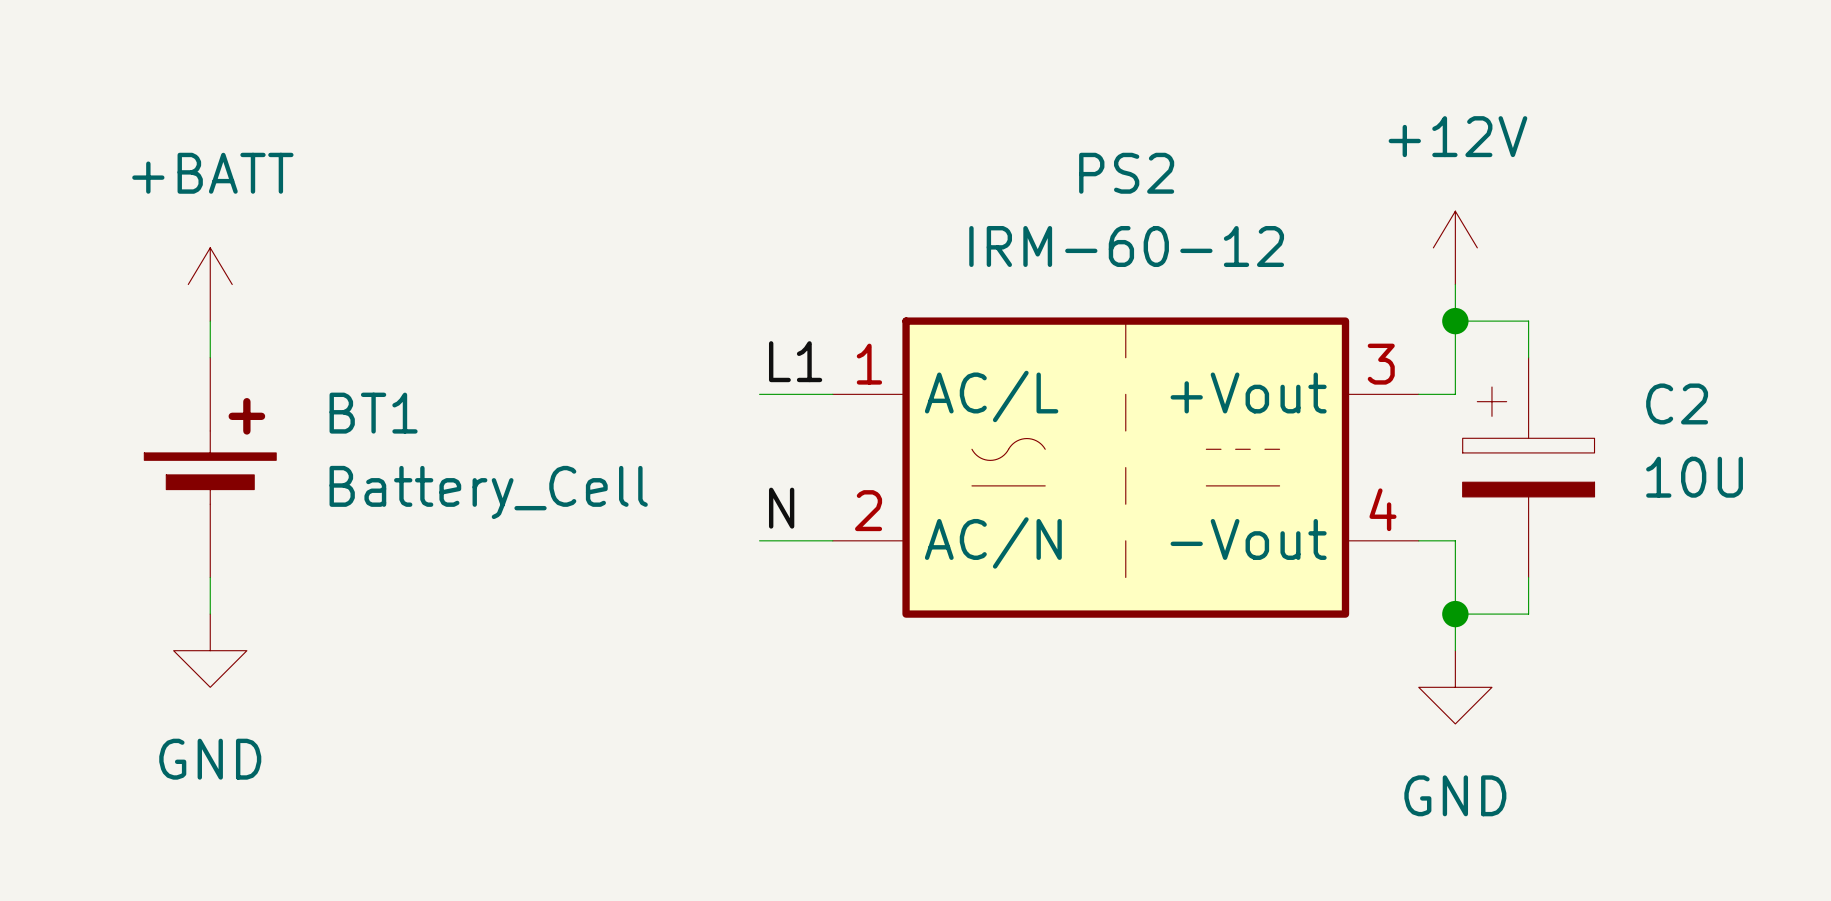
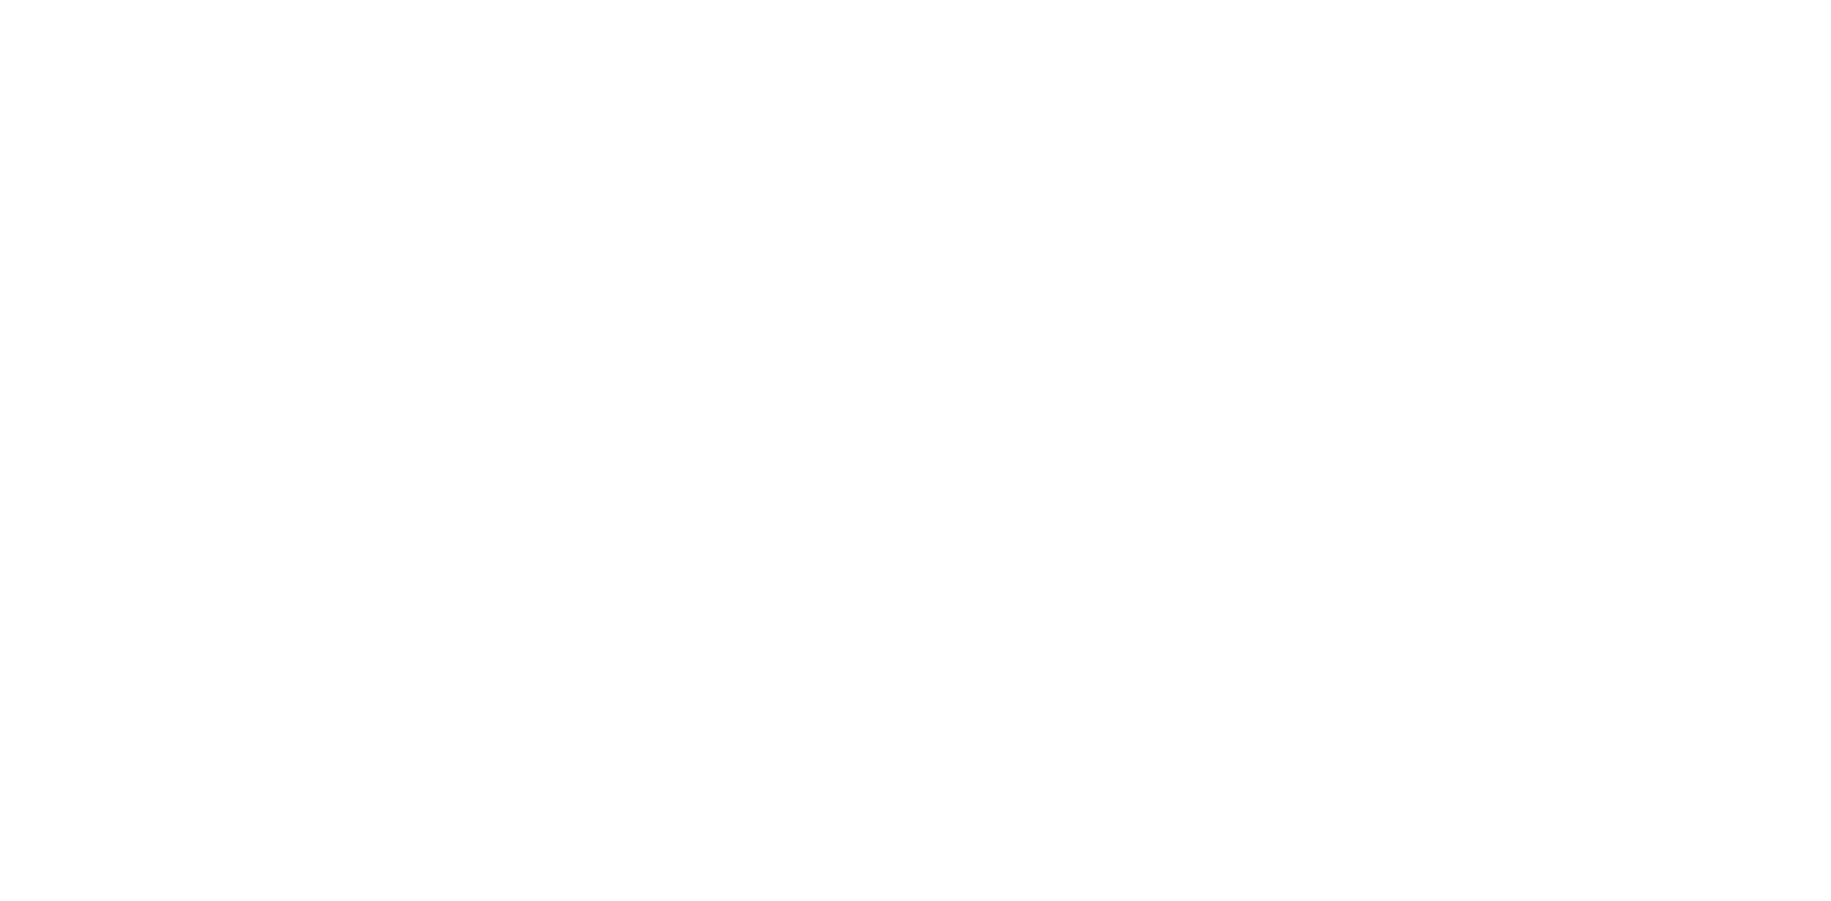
power symbol: +12V (1455, 247) -> none
power symbol: +BATT (210, 284) -> none
wire: (1455, 284) (1455, 394) (1418, 394) -> none
wire: (210, 321) (210, 357) -> none
wire: (1455, 321) (1528, 321) (1528, 357) -> none
junction: (1455, 321) -> none
label: L1 (795, 361) -> none
wire: (759, 394) (832, 394) -> none
BT1: Battery_Cell (210, 467) -> none
PS2: IRM-60-12 (1125, 467) -> none
C2: 10U (1528, 467) -> none
label: N (781, 508) -> none
wire: (759, 540) (832, 540) -> none
wire: (1418, 540) (1455, 540) (1455, 650) -> none
wire: (210, 577) (210, 614) -> none
wire: (1528, 577) (1528, 614) (1455, 614) -> none
junction: (1455, 614) -> none
power symbol: GND (210, 650) -> none
power symbol: GND (1455, 687) -> none

